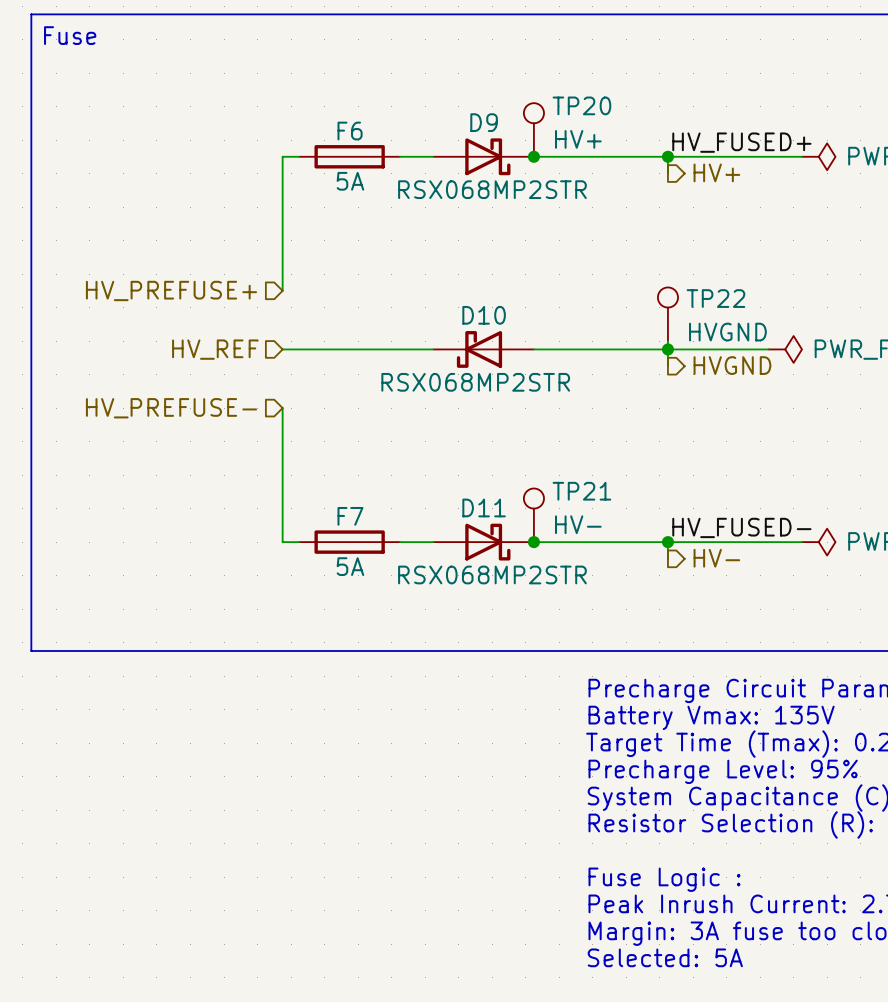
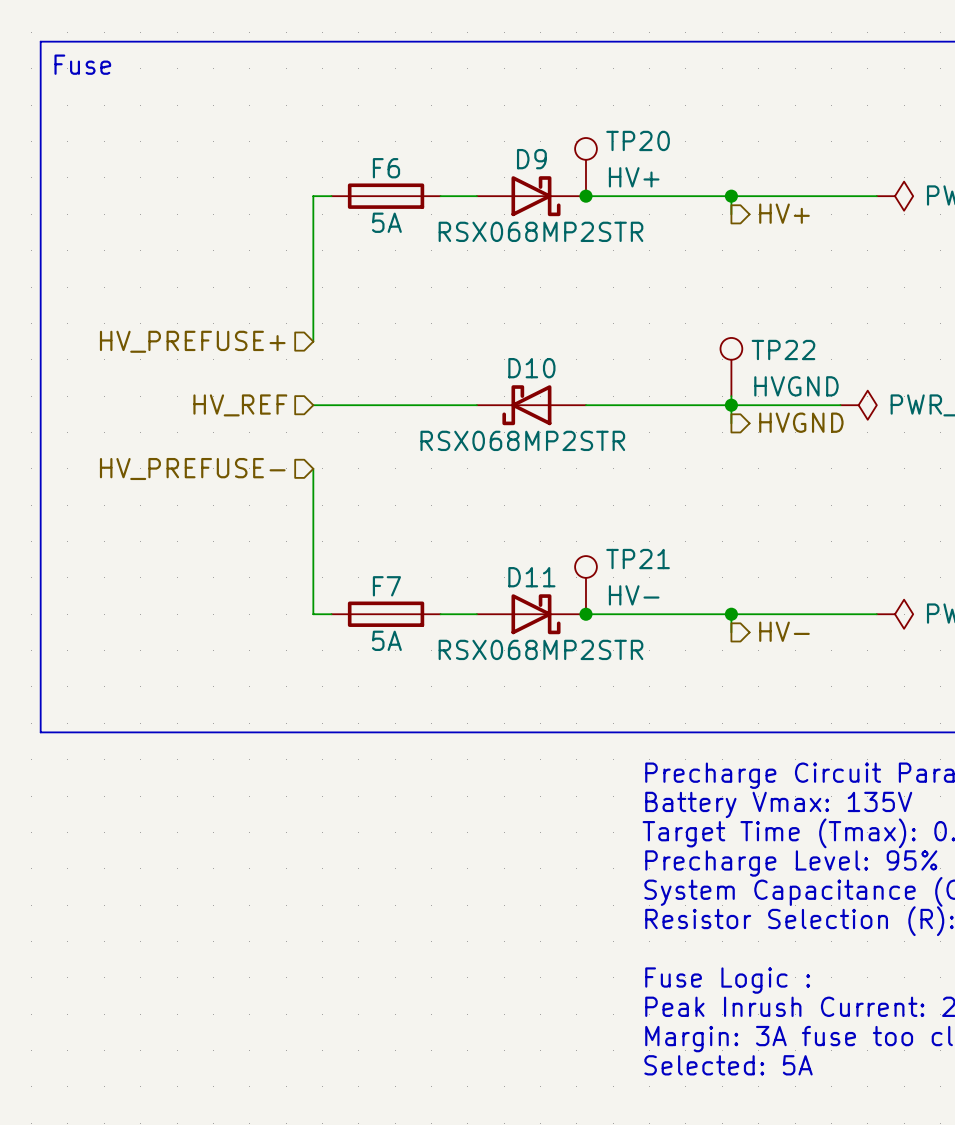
label: HV_FUSED+ (741, 142) -> none
label: HV_FUSED- (741, 527) -> none

